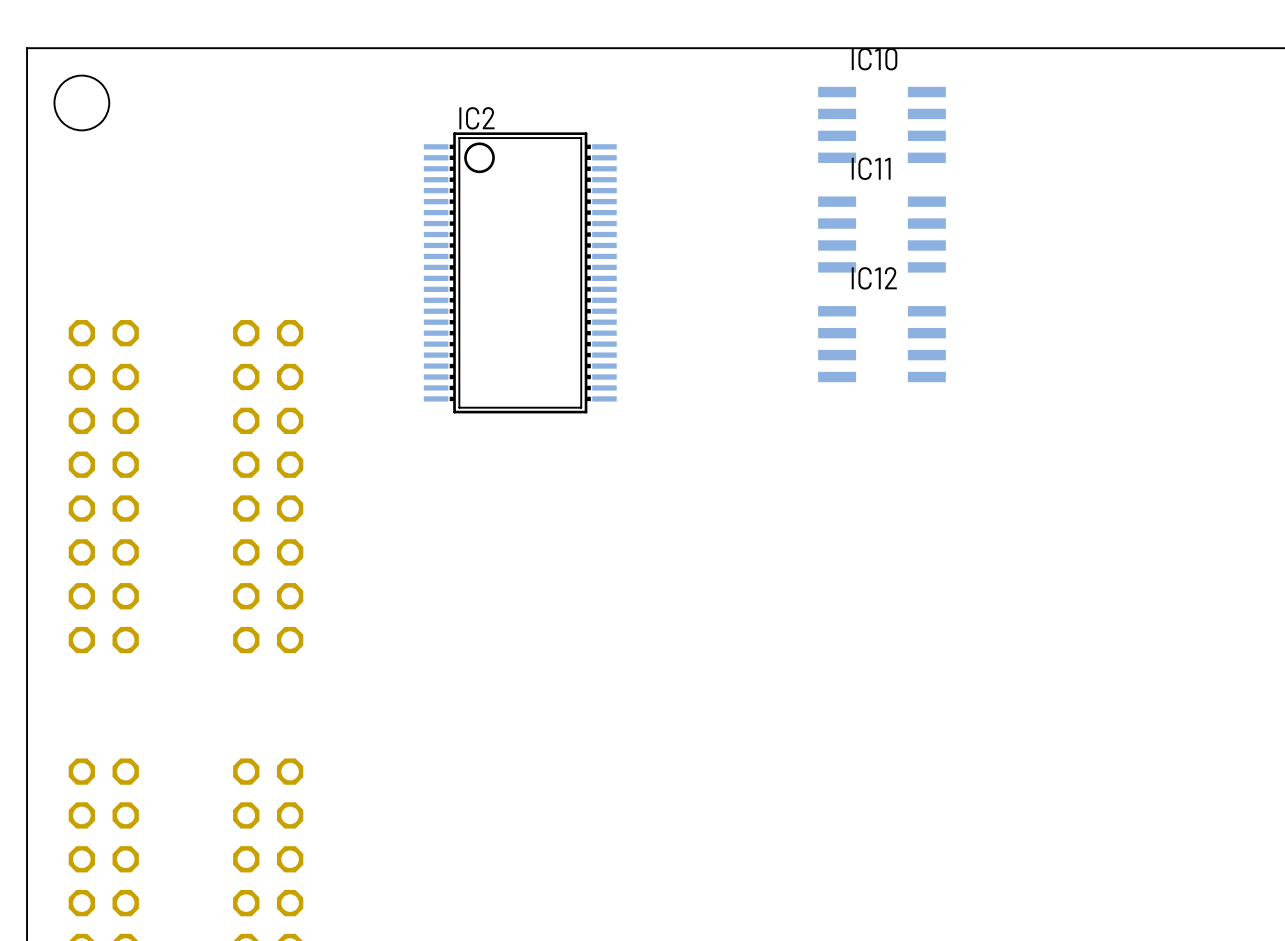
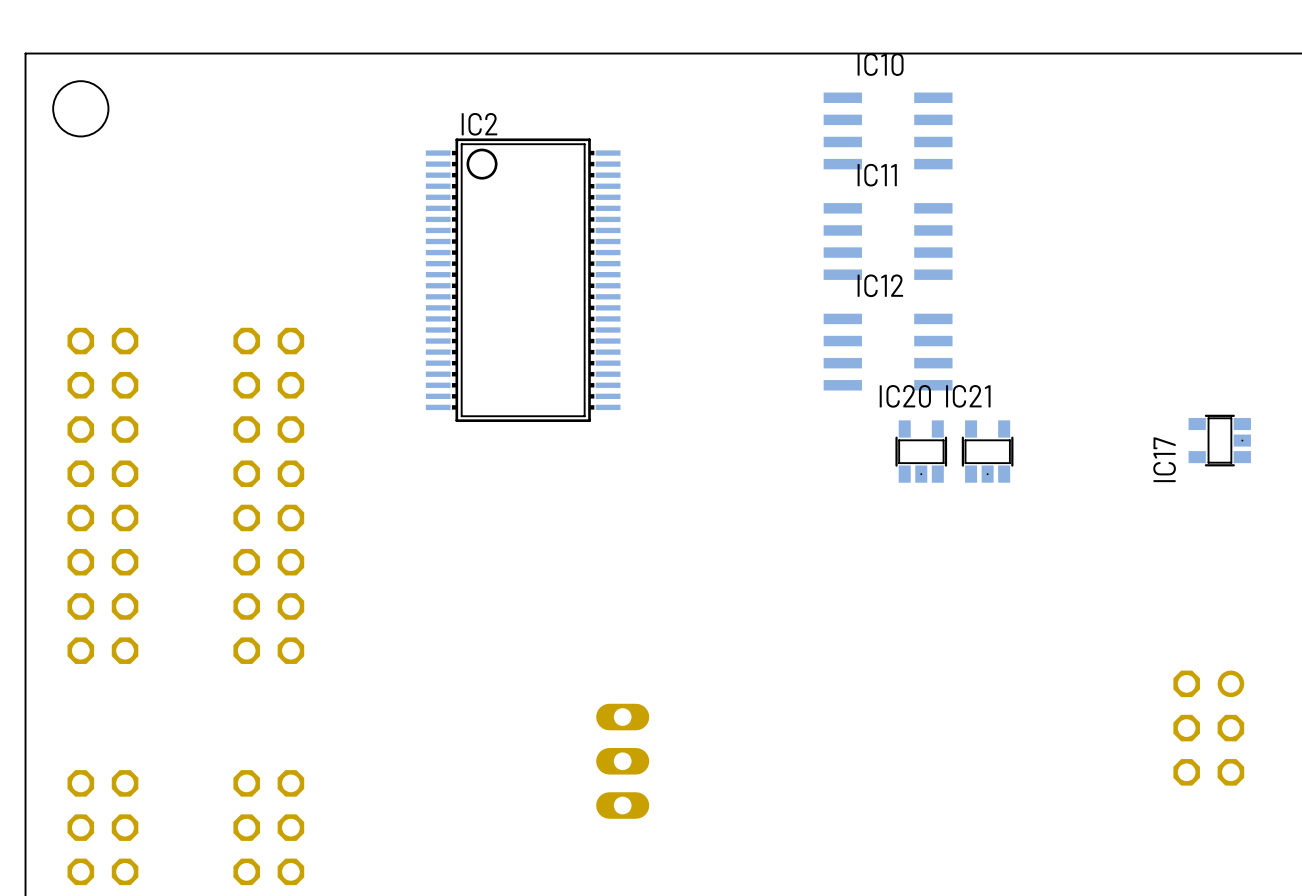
IC17: none -> (1219, 440)
IC20: none -> (921, 451)
IC21: none -> (987, 451)
part: none -> (1208, 728)
part: none -> (622, 761)

